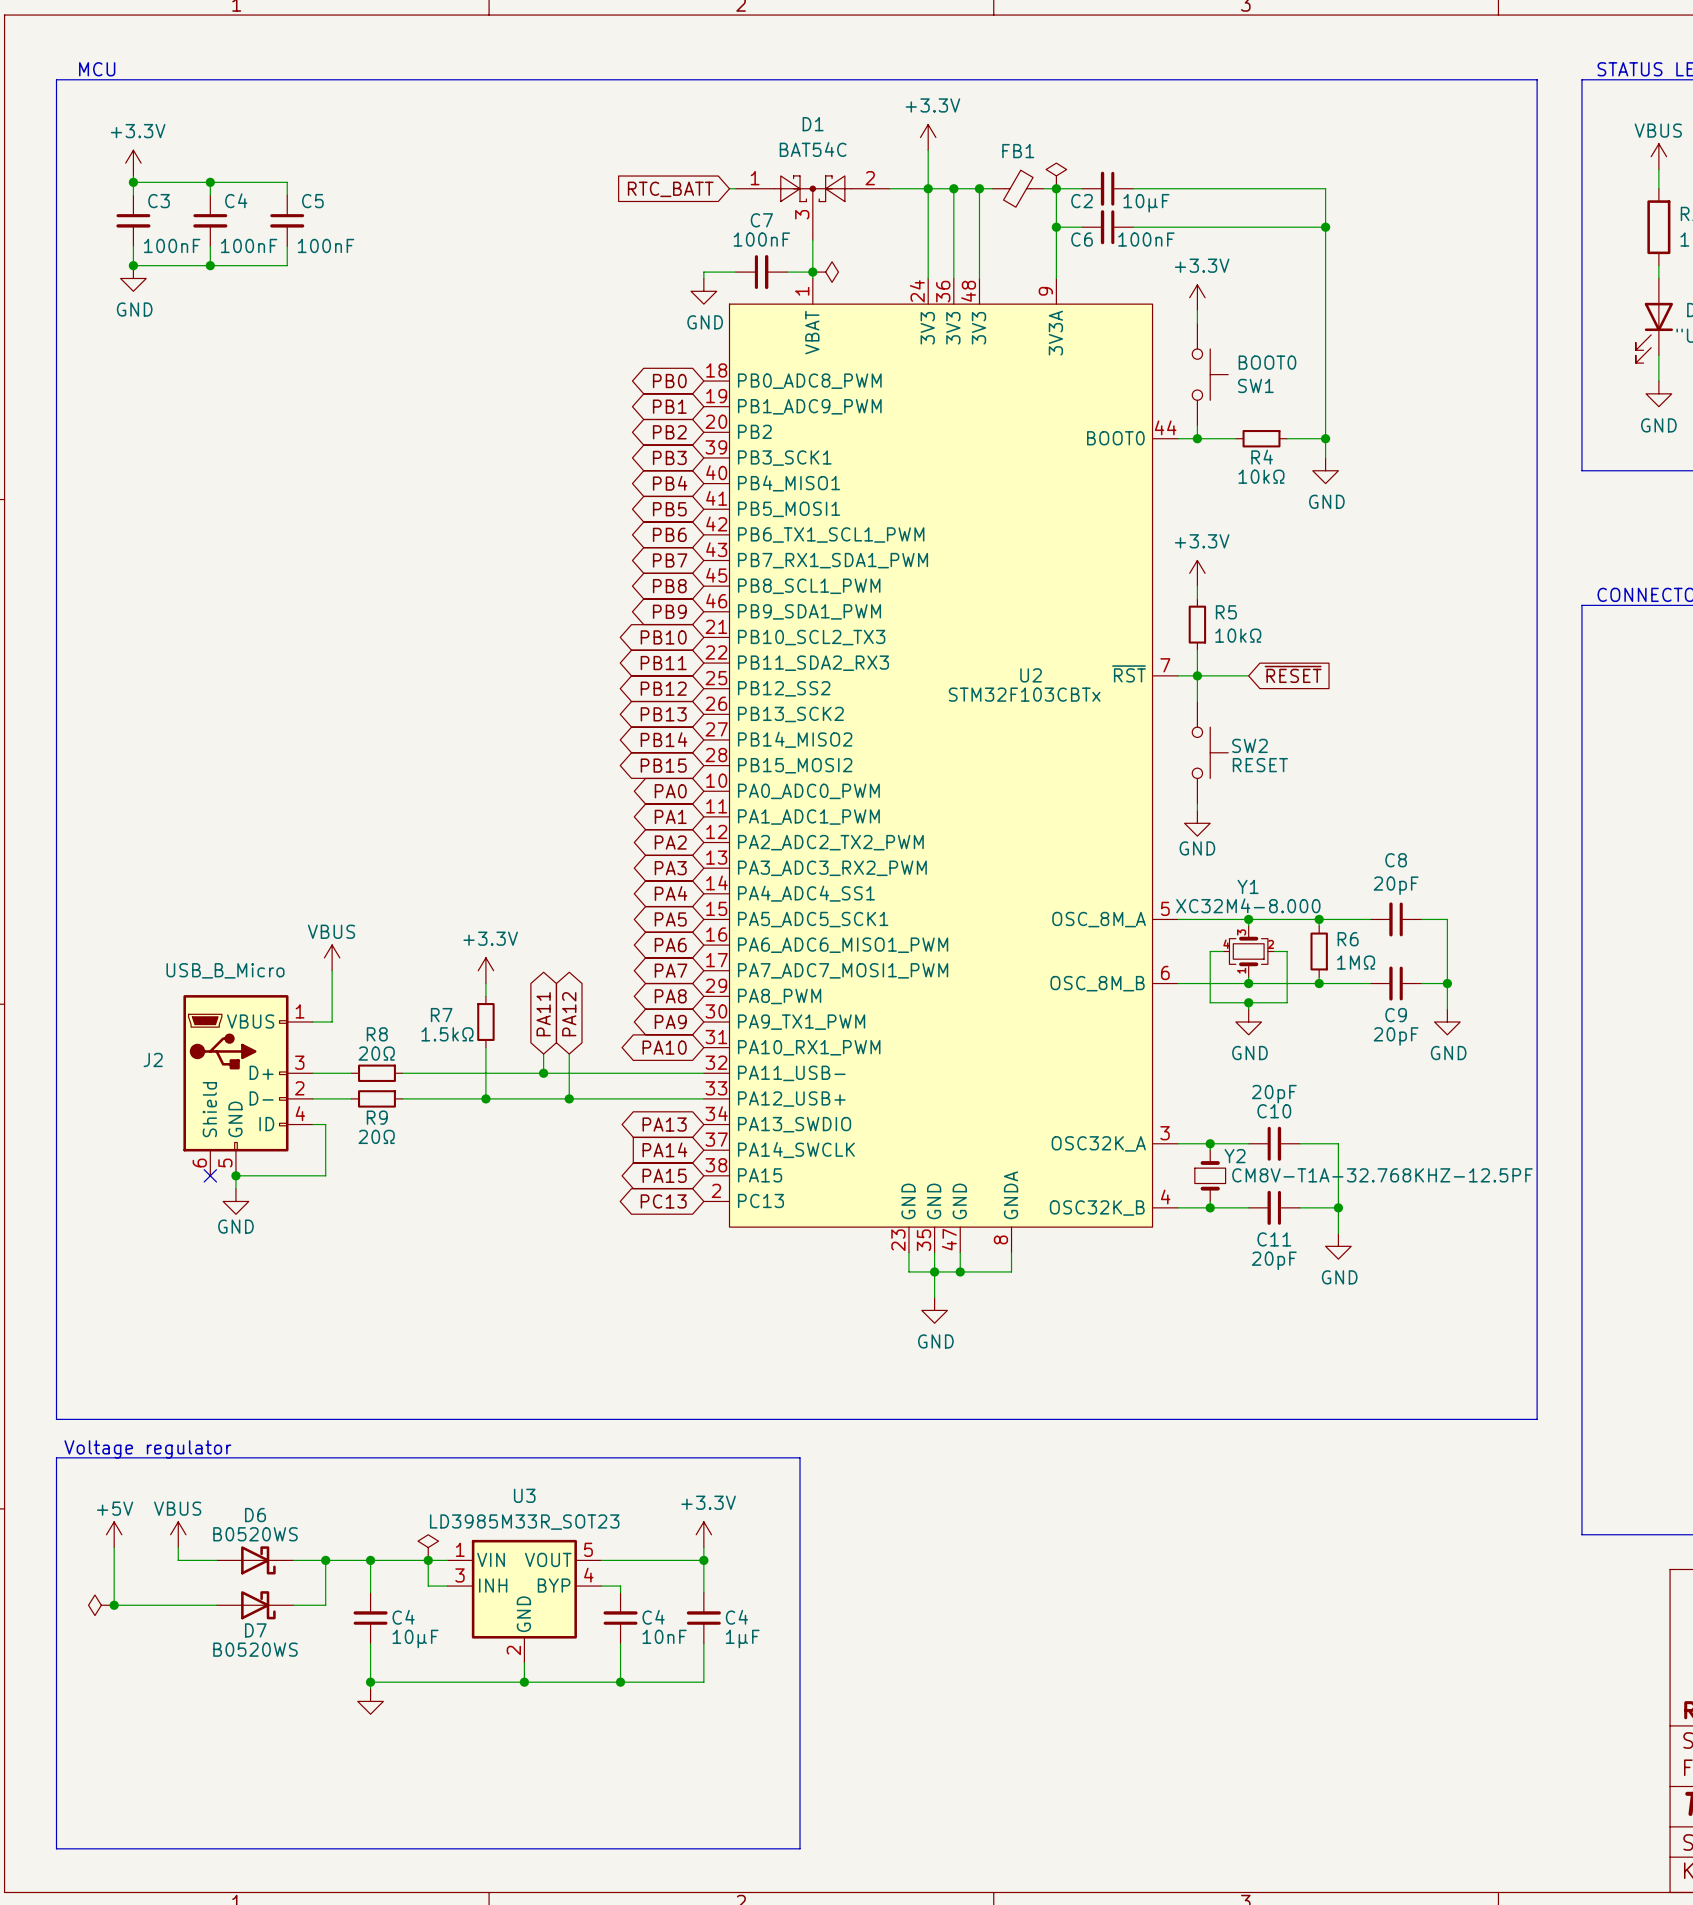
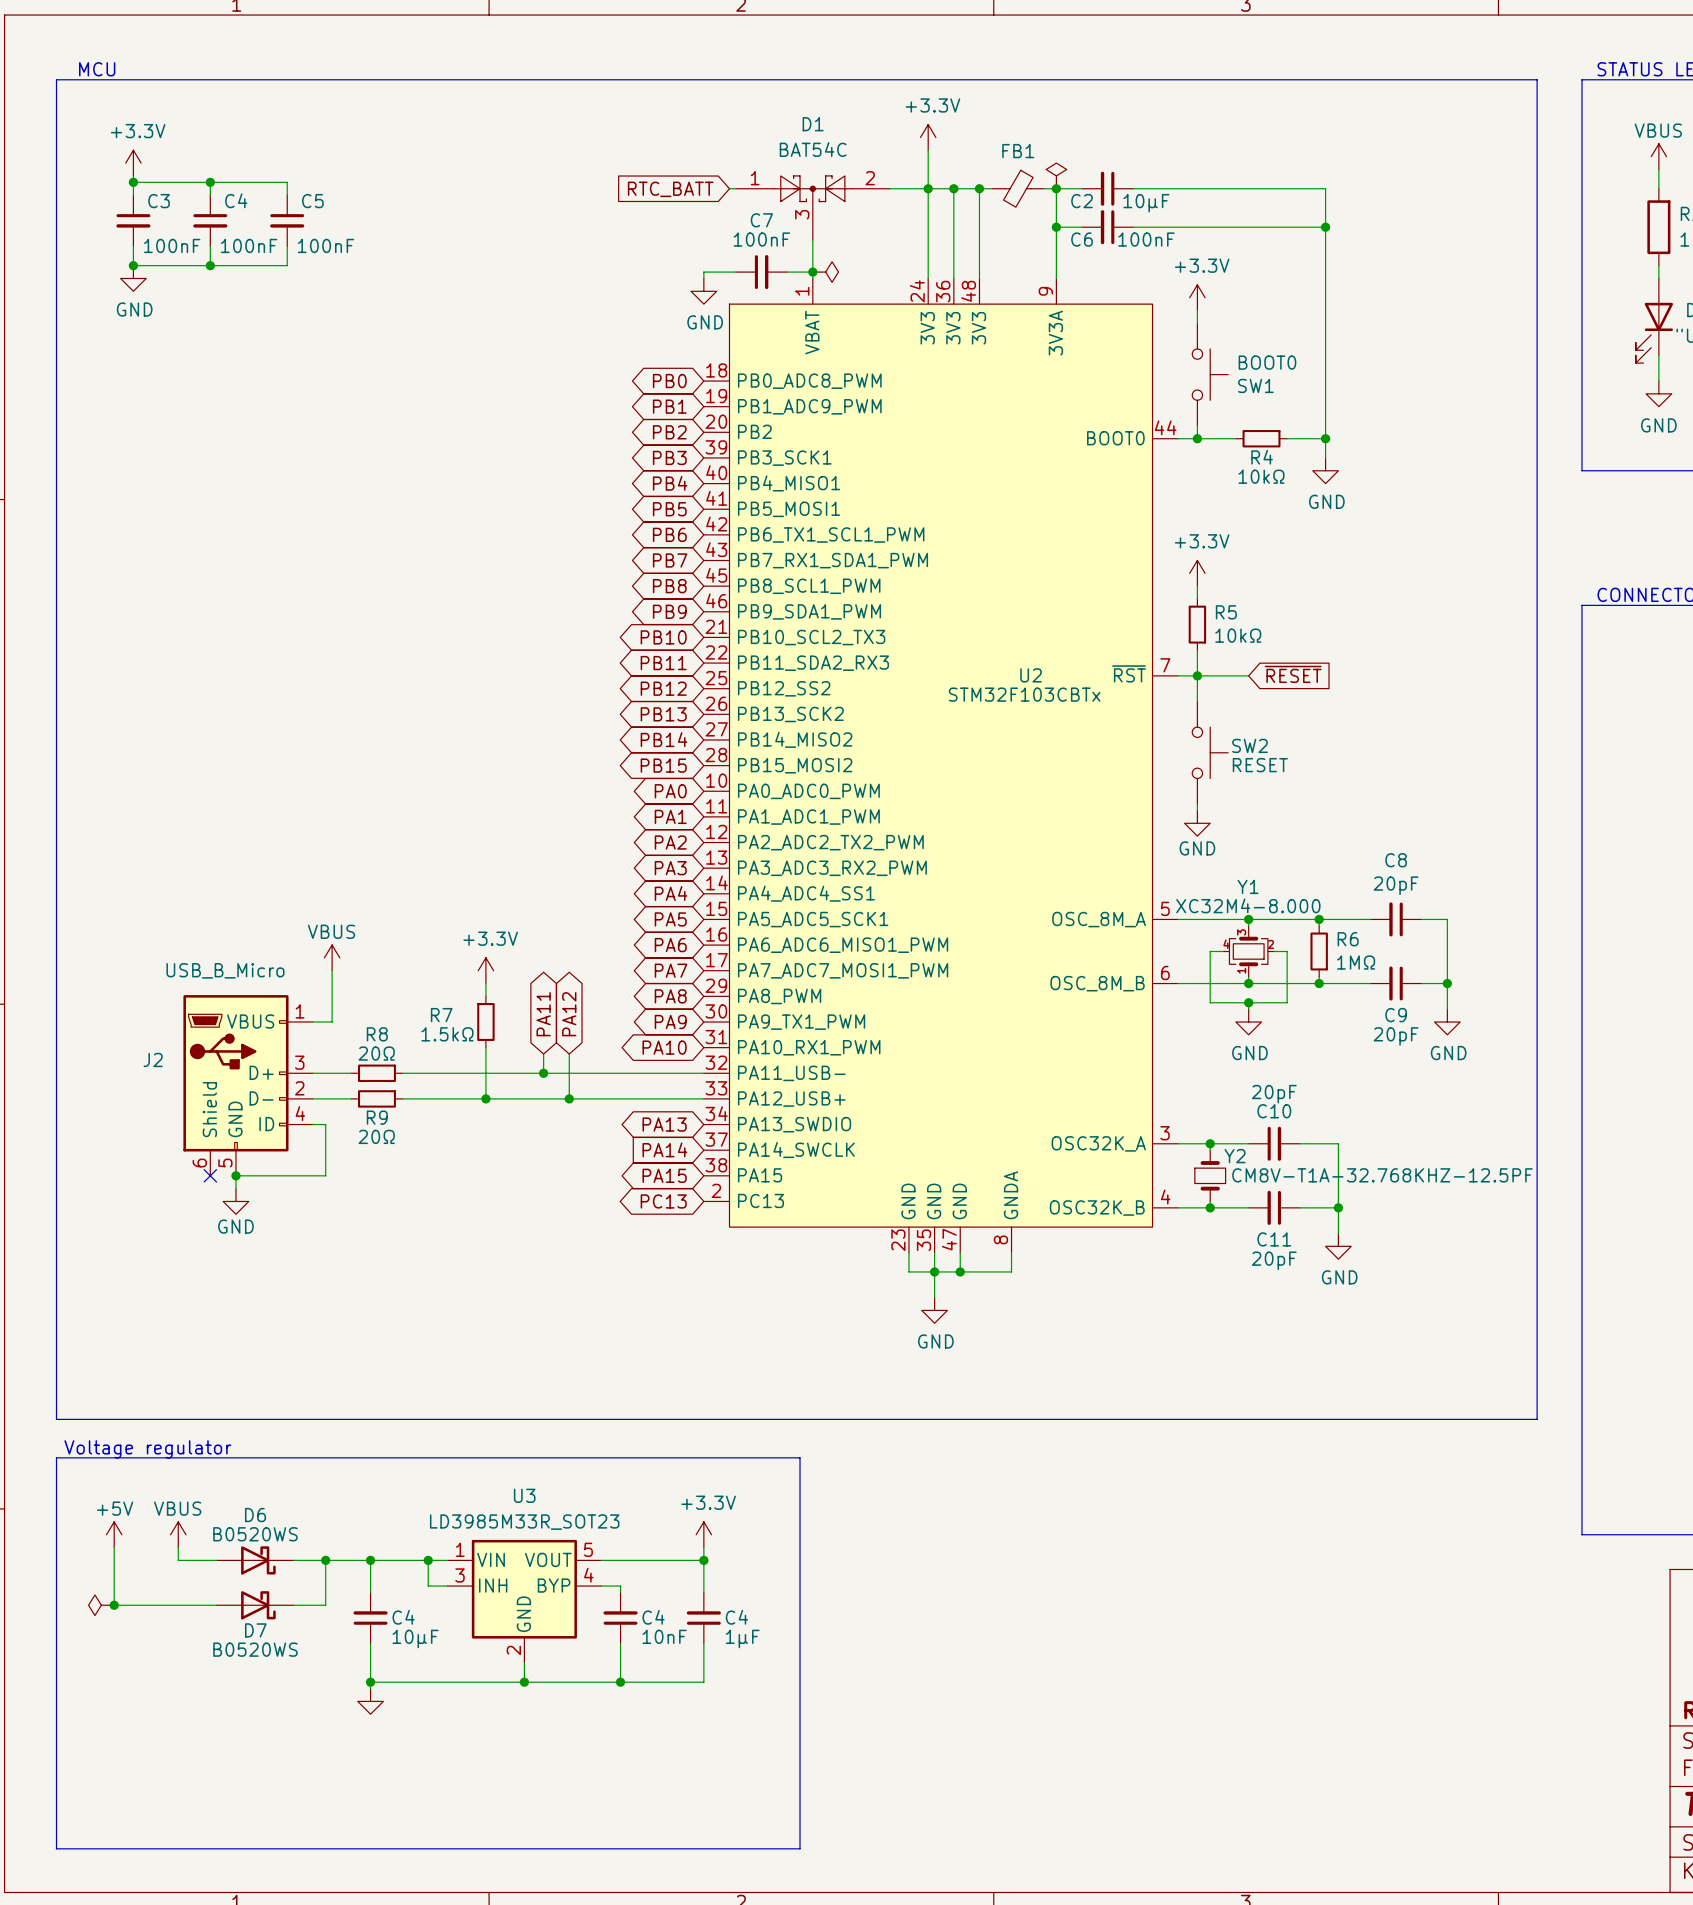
power symbol: (428, 1547) -> none

